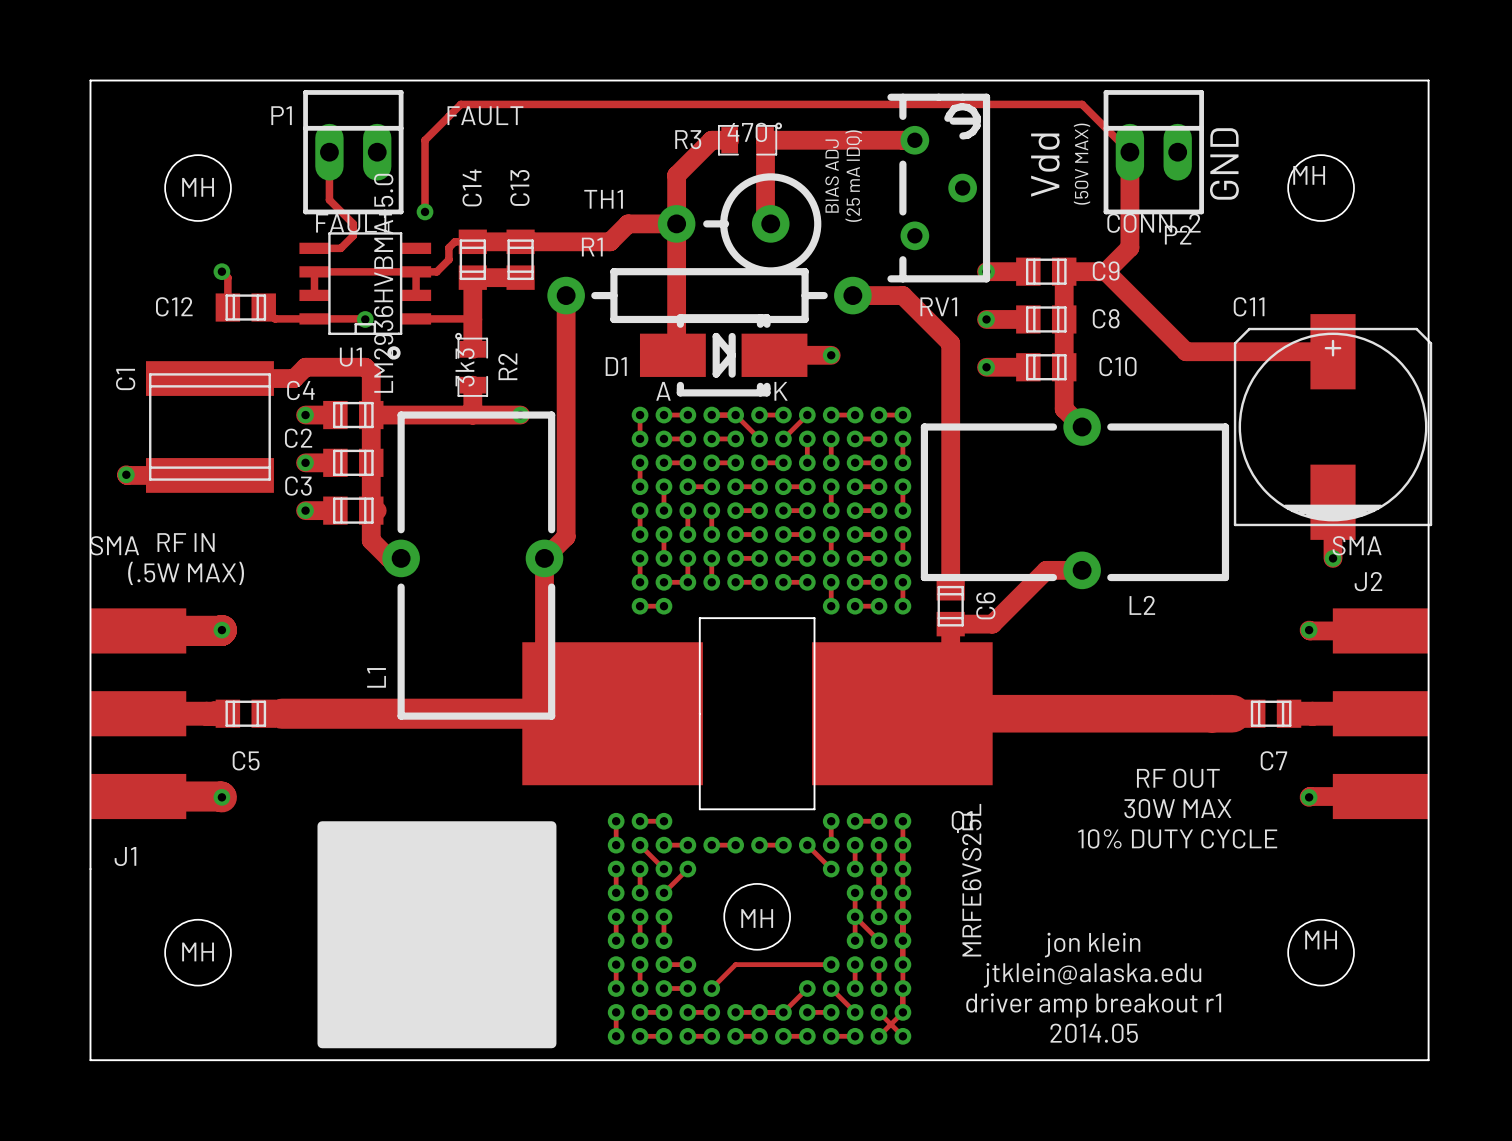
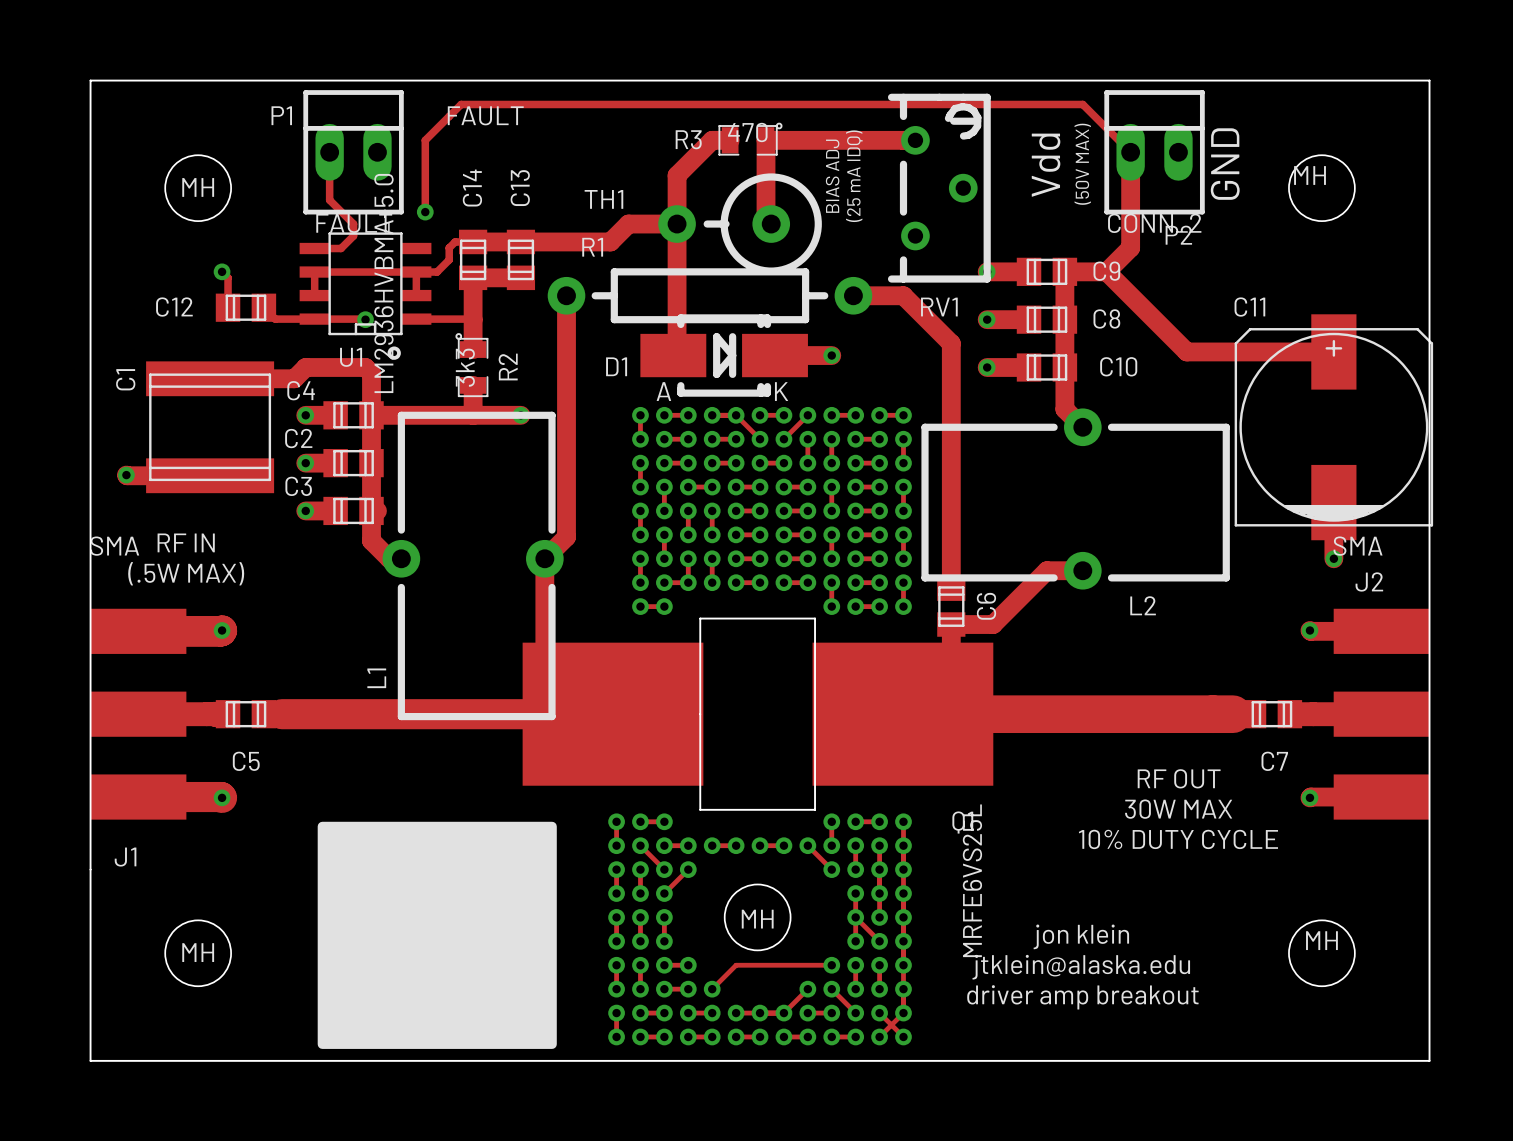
text position: jon klein (1092, 945) -> jon klein (1081, 936)
text position: jtklein@alaska.edu (1092, 975) -> jtklein@alaska.edu (1081, 967)
text: driver amp breakout r1 (1093, 1005) -> driver amp breakout (1082, 997)
text: 2014.05 (1094, 1033) -> none

